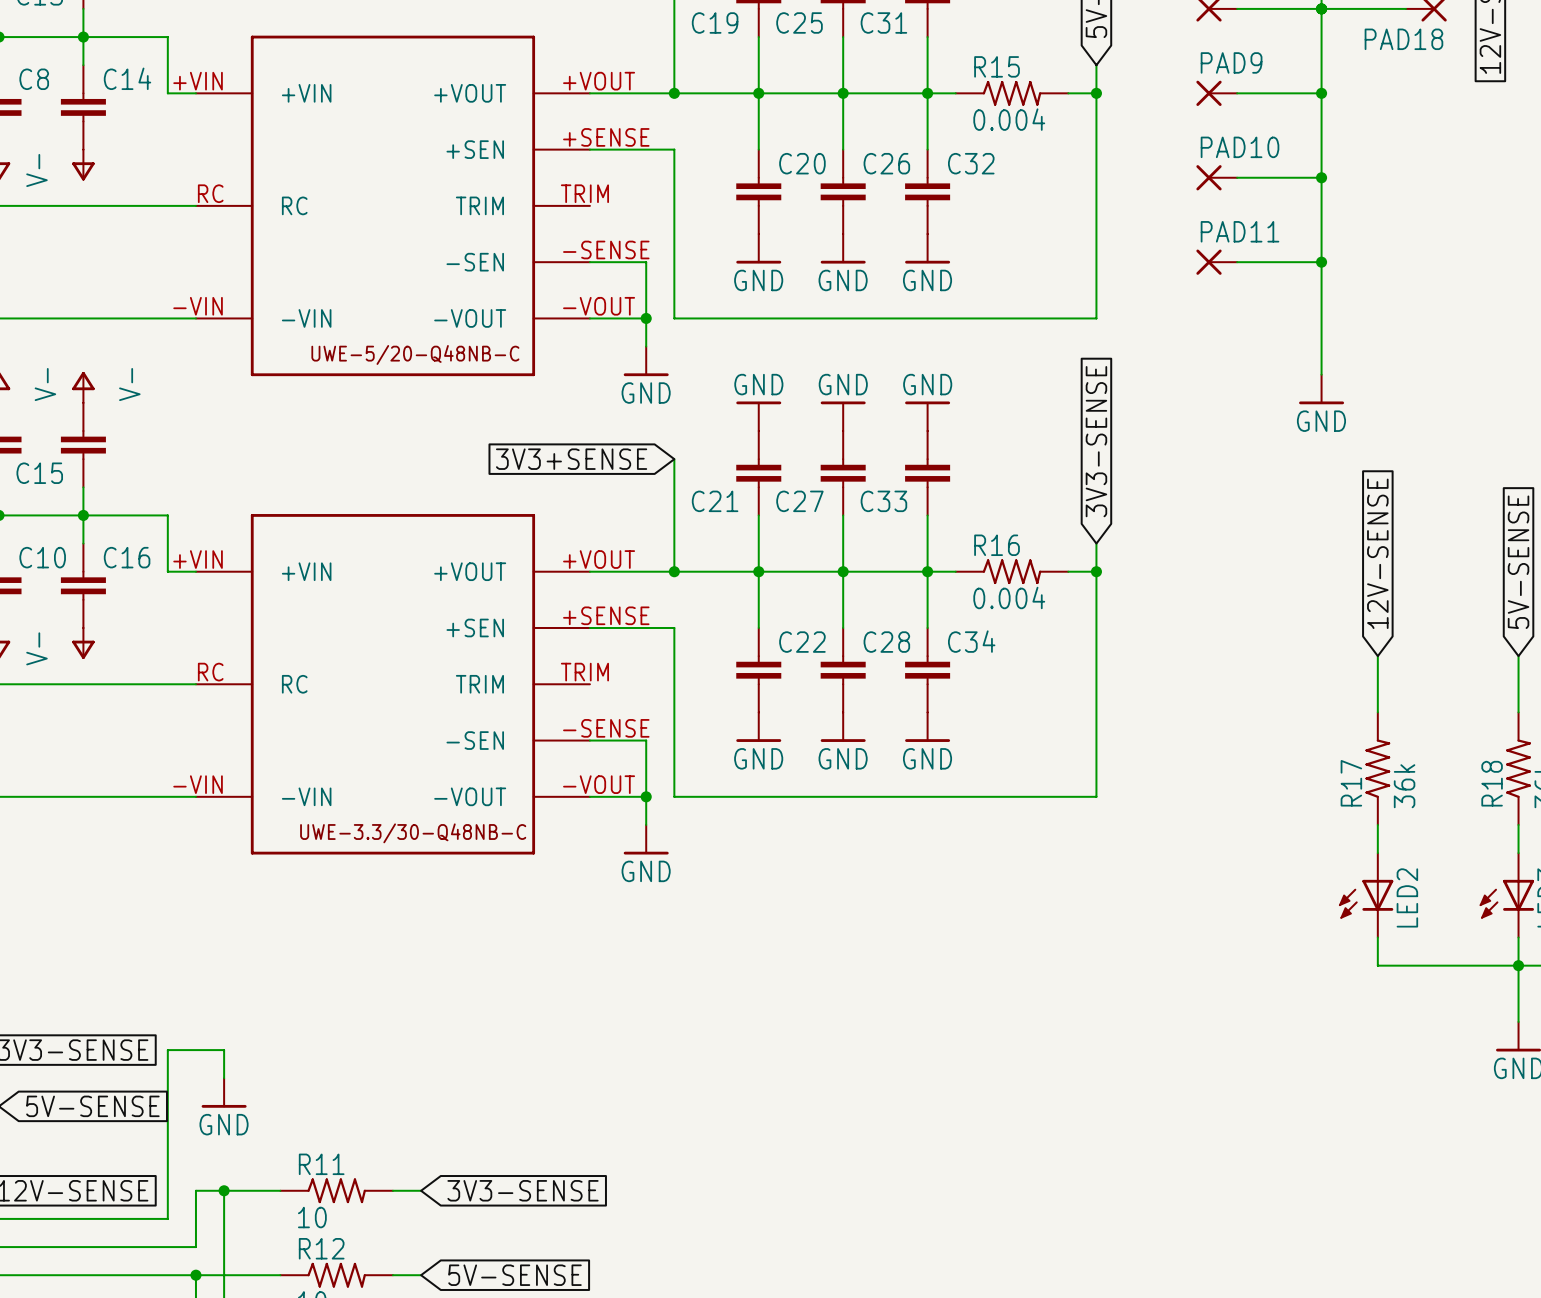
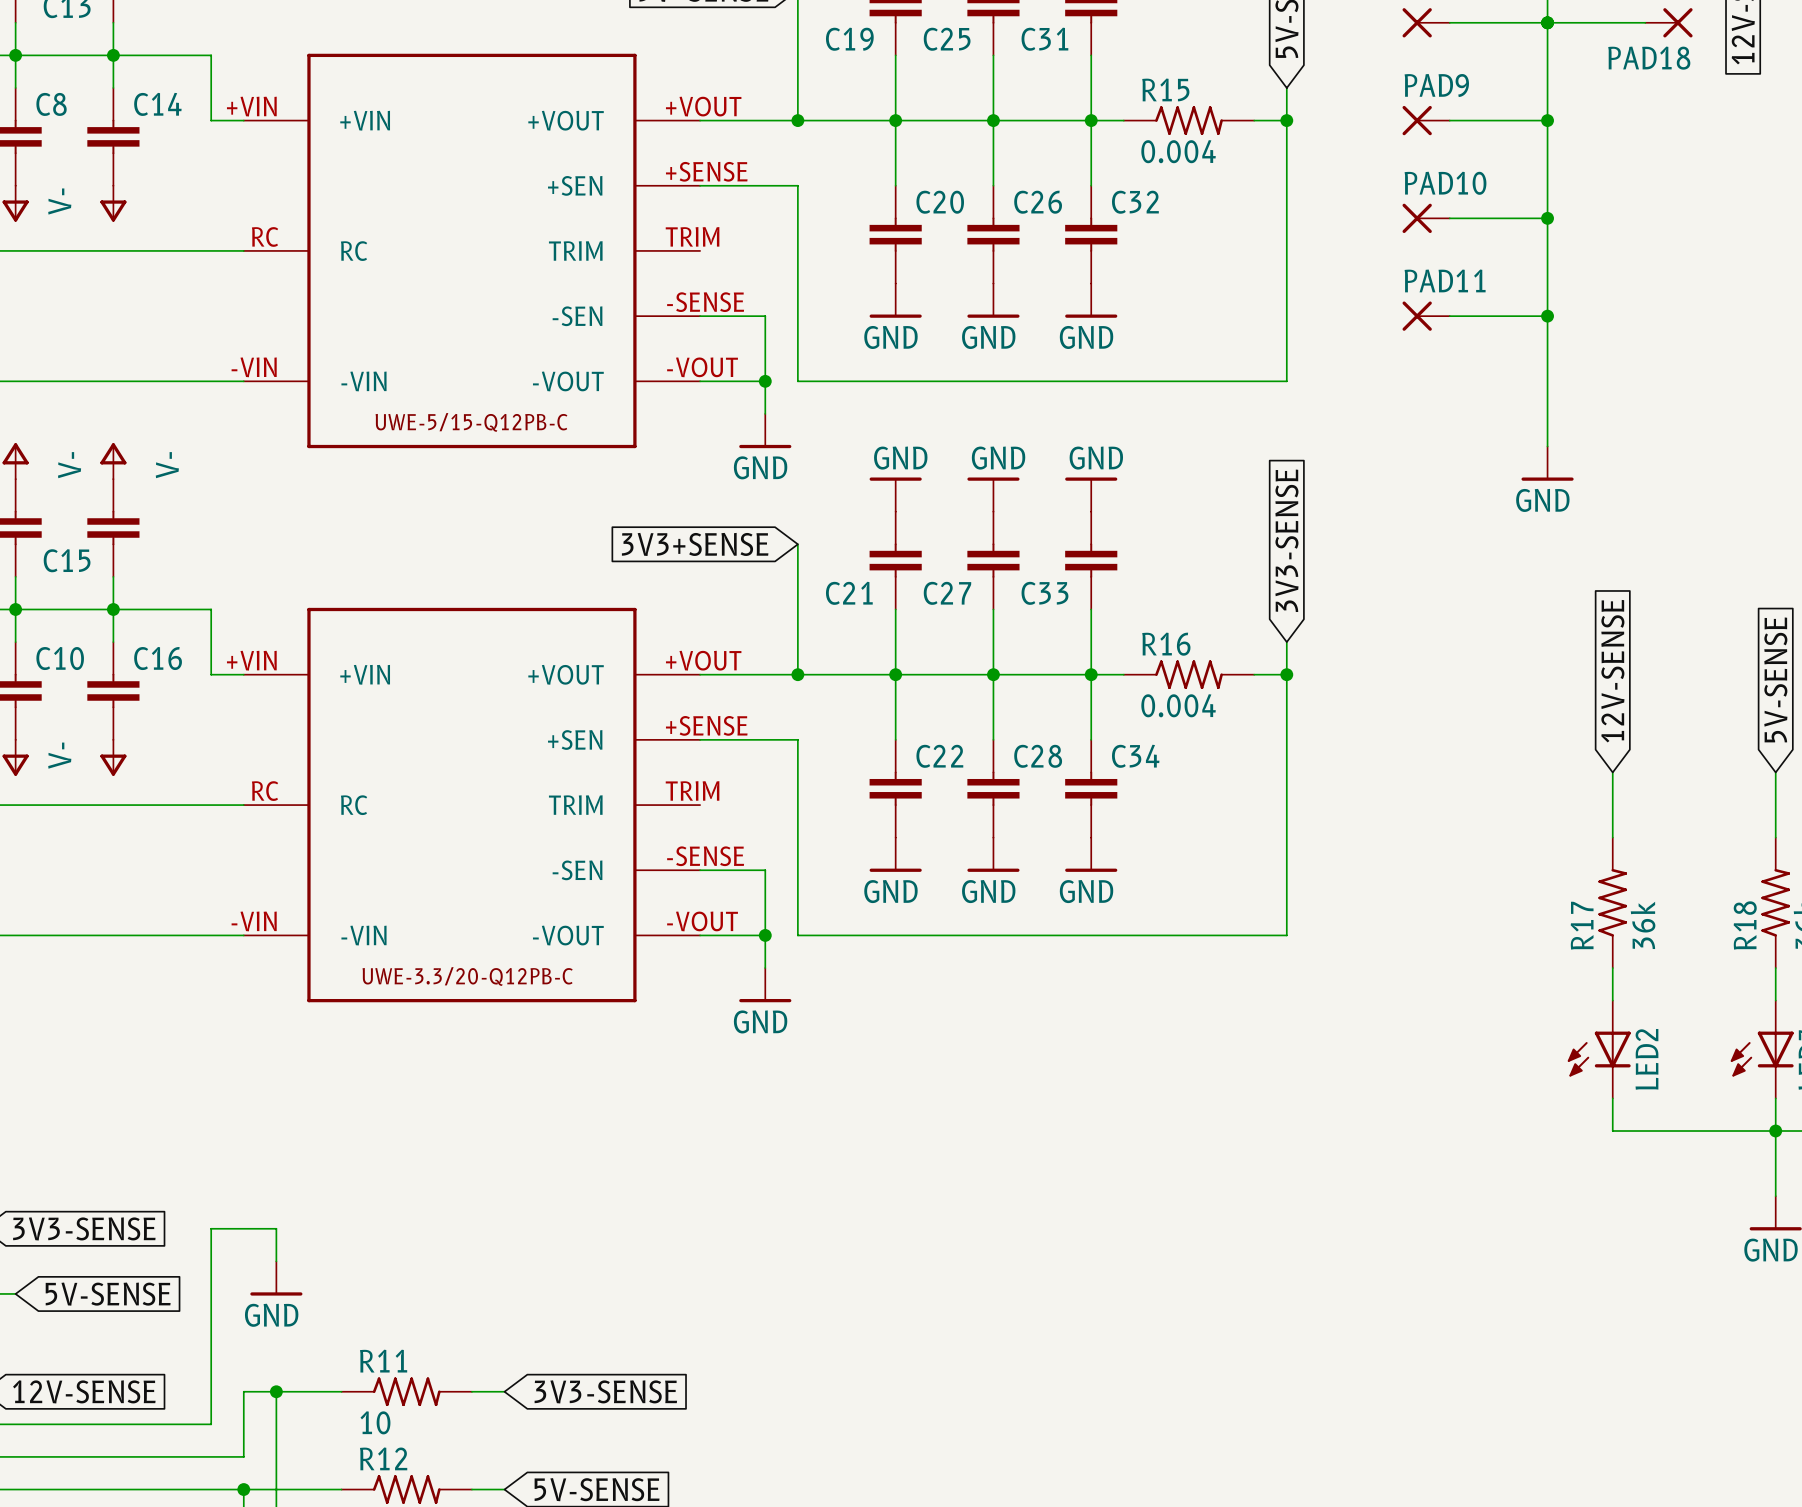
part text: UWE-5/20-Q48NB-C (415, 354) -> UWE-5/15-Q12PB-C (471, 422)
part text: UWE-3.3/30-Q48NB-C (413, 833) -> UWE-3.3/20-Q12PB-C (467, 976)

